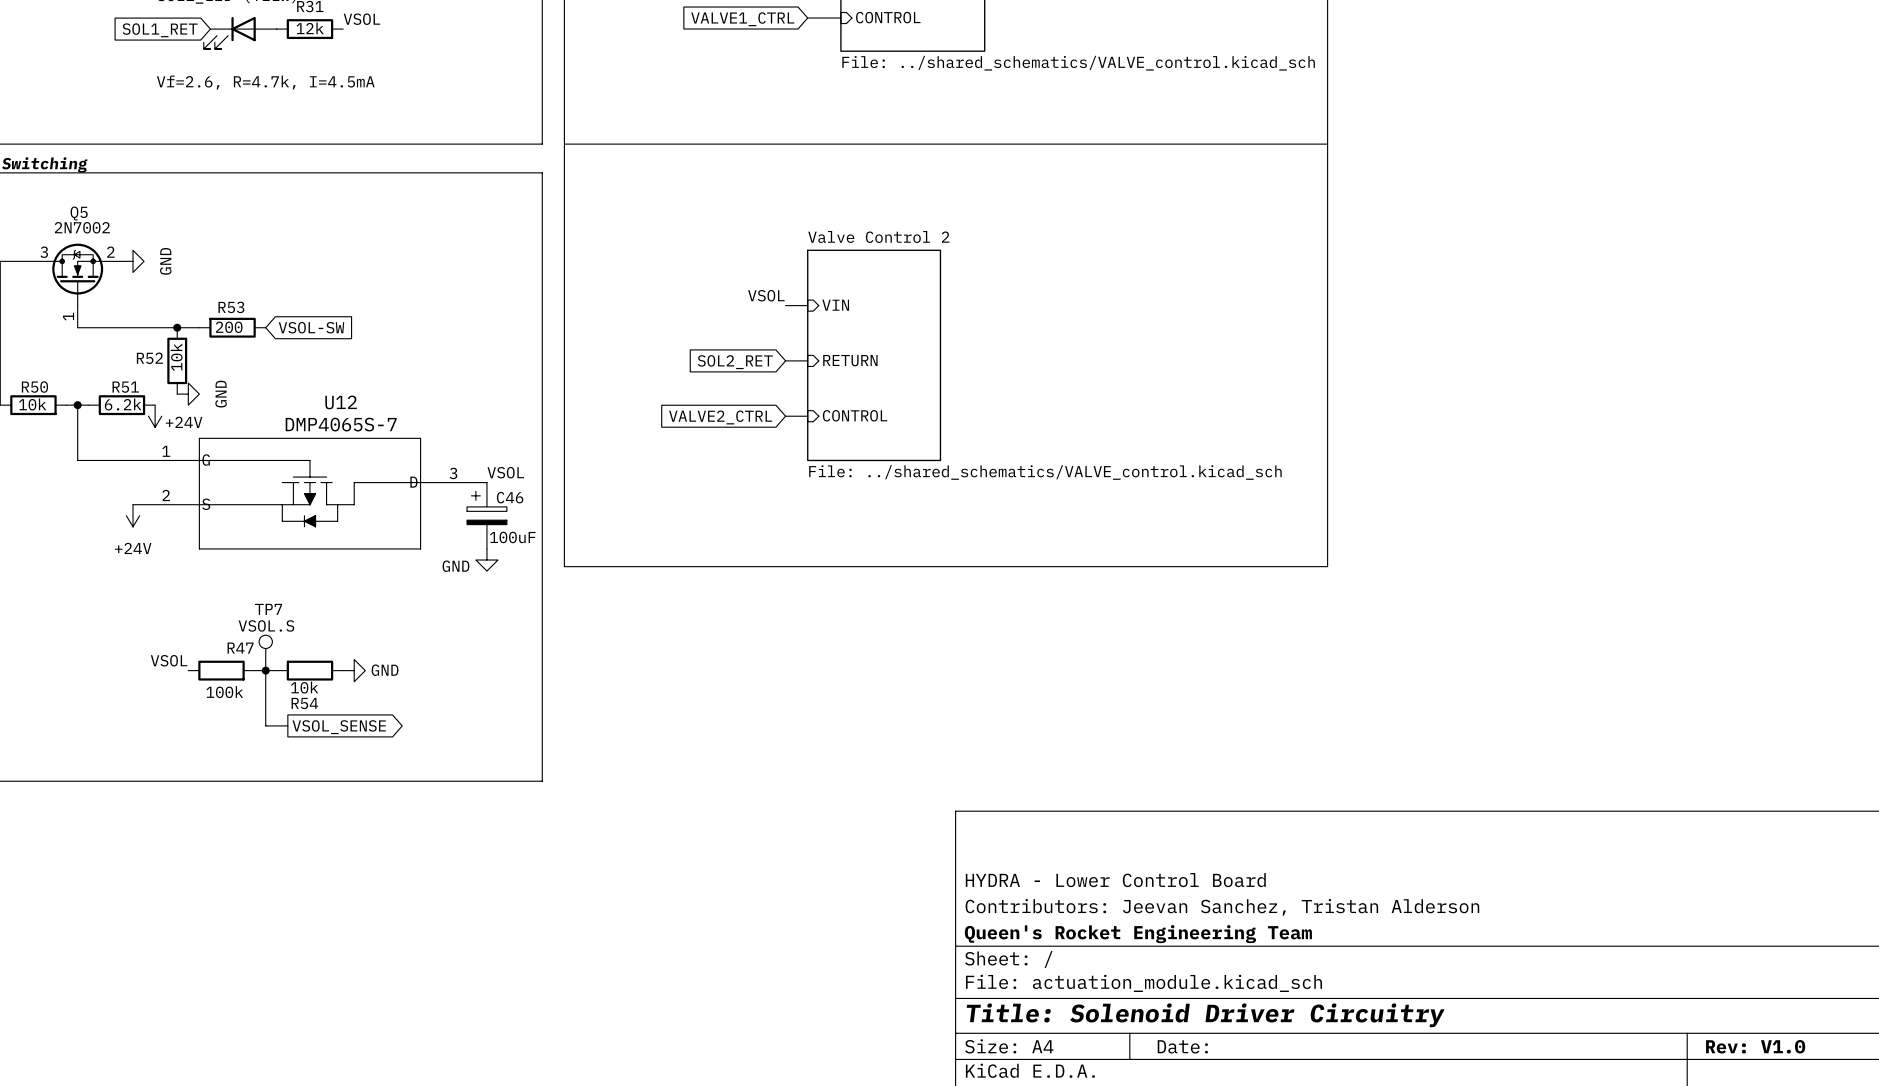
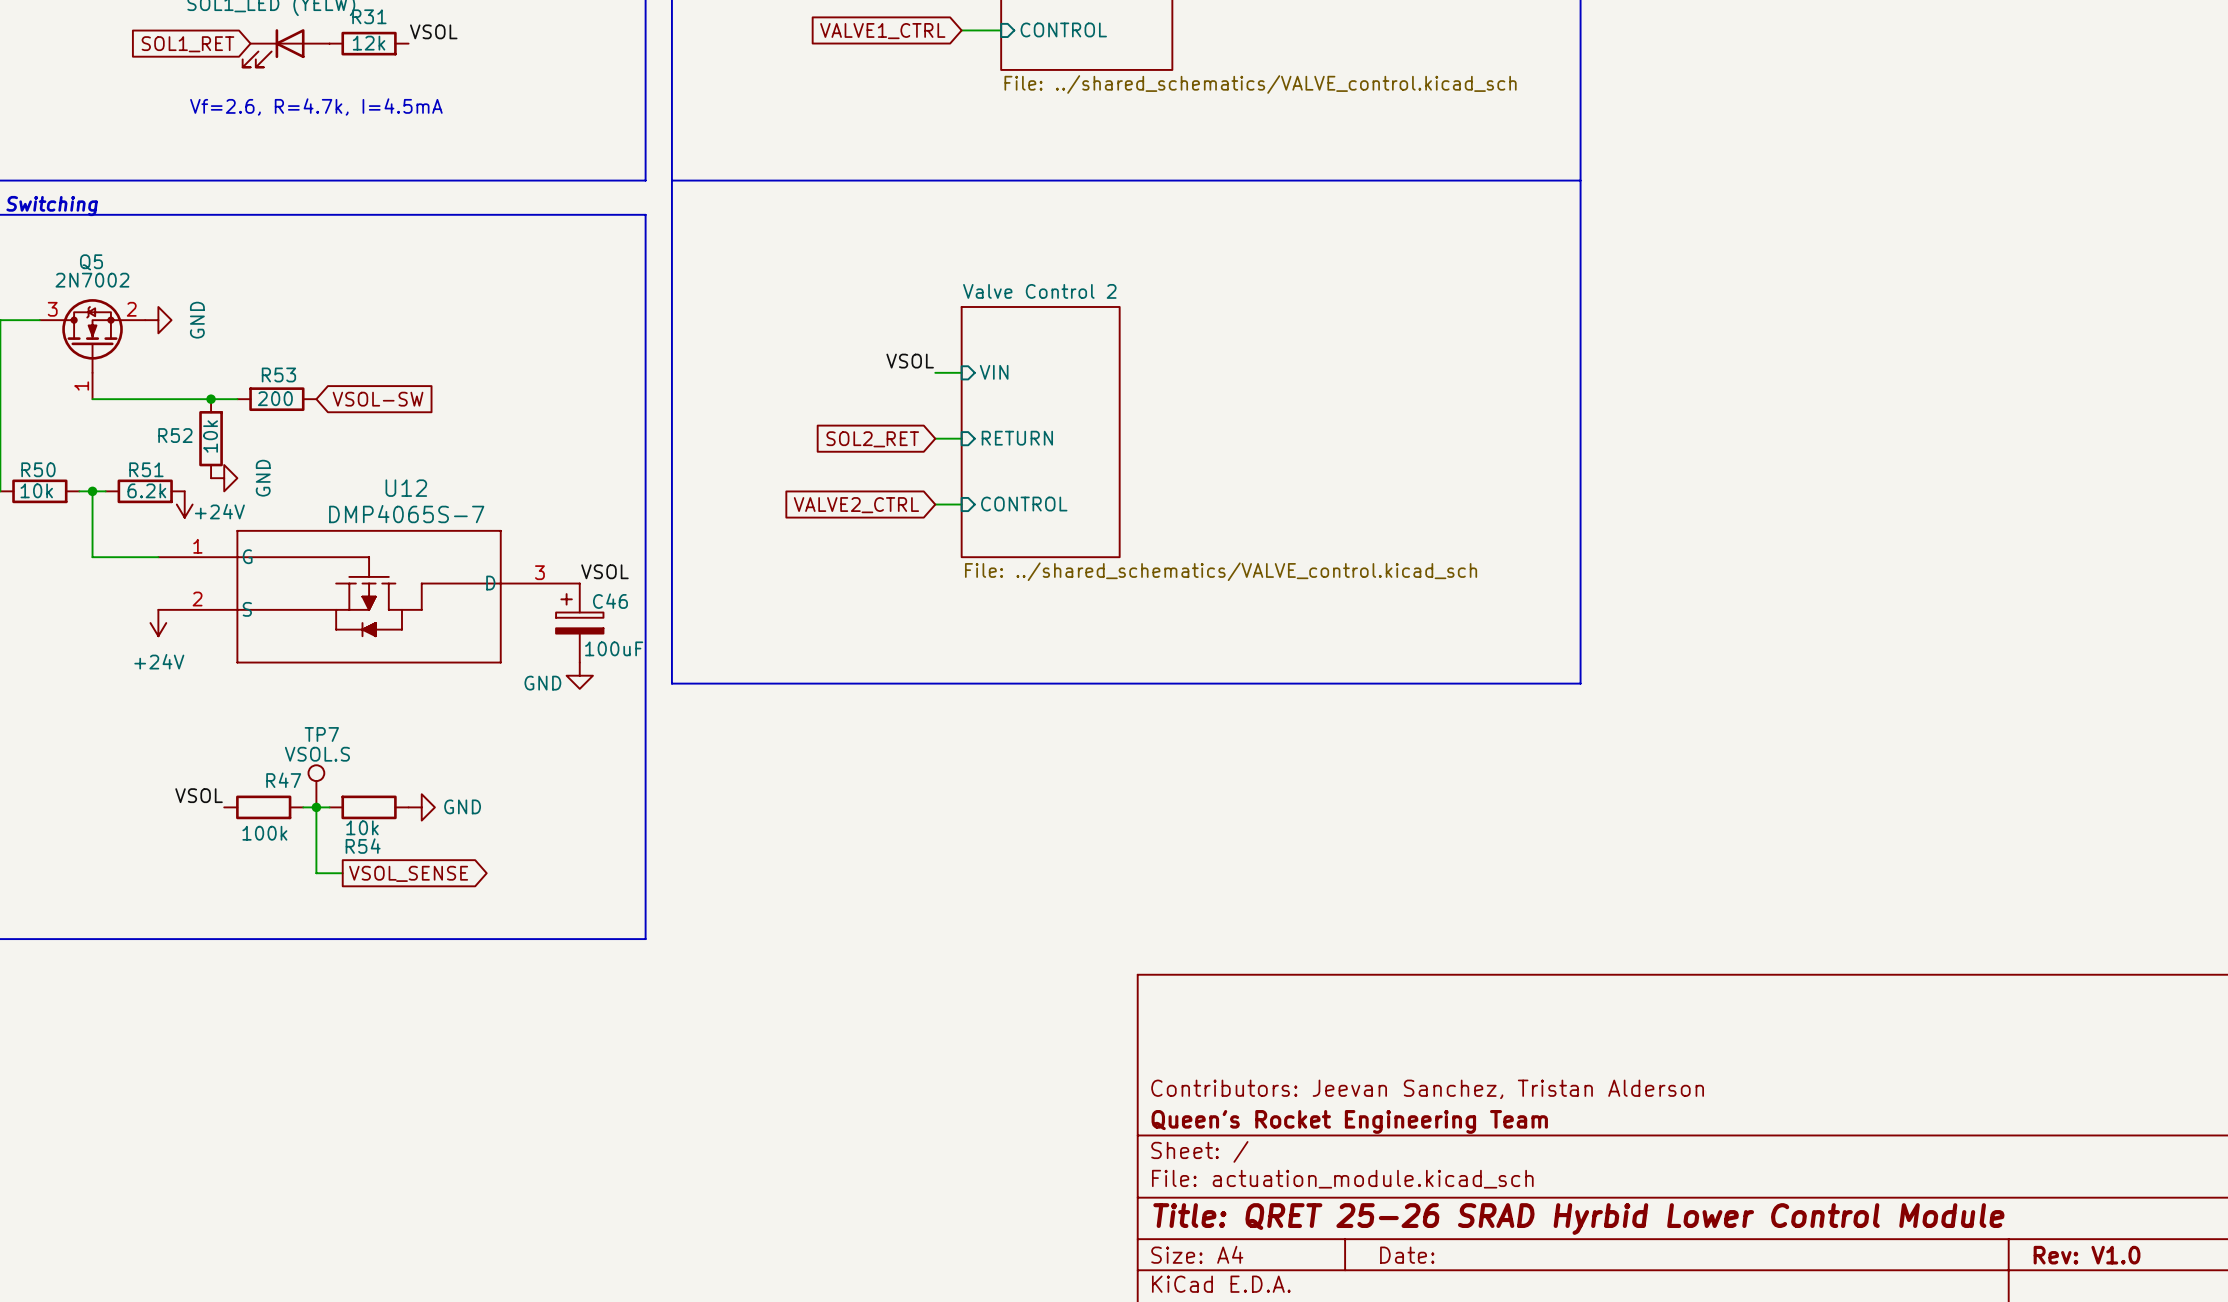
title block: HYDRA - Lower Control Board (1115, 880) -> none
title block: Title: Solenoid Driver Circuitry (1205, 1015) -> Title: QRET 25-26 SRAD Hyrbid Lower Control Module (1578, 1219)

